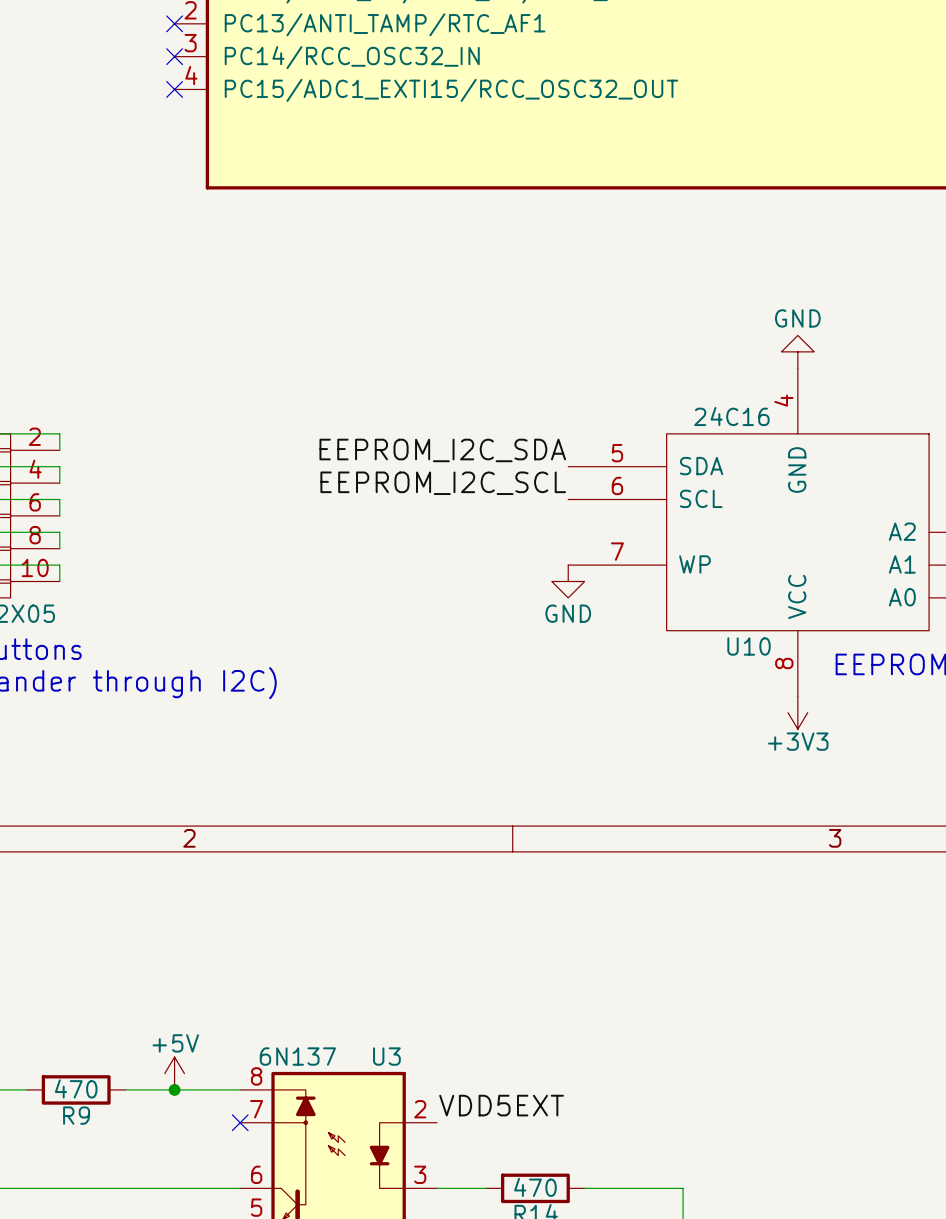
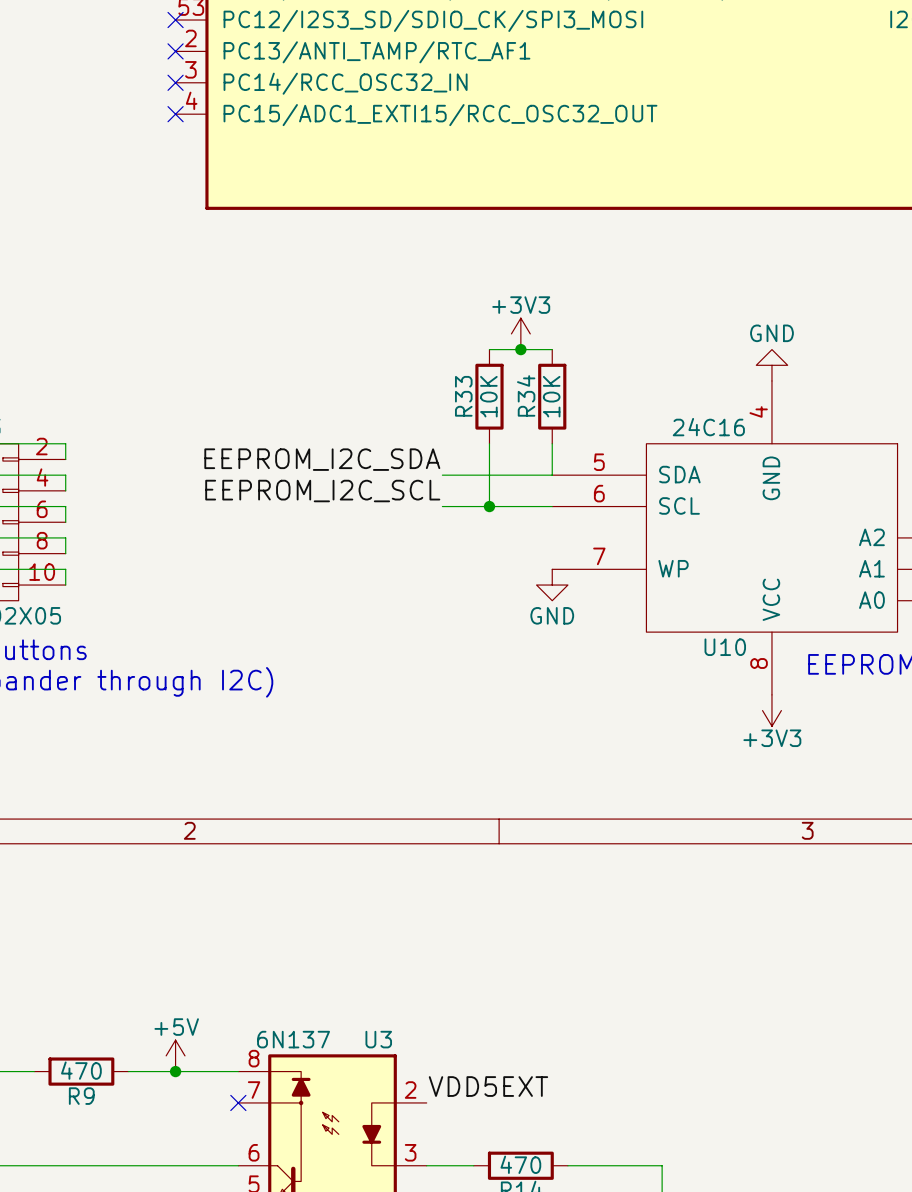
power symbol: none -> +3V3 (520, 333)
wire: none -> (489, 349) (552, 349)
junction: none -> (520, 349)
R33: none -> 10K (489, 396)
R34: none -> 10K (552, 396)
wire: none -> (489, 443) (489, 506)
wire: none -> (552, 443) (552, 475) (442, 475)
label position: EEPROM_I2C_SDA (442, 450) -> EEPROM_I2C_SDA (322, 459)
label position: EEPROM_I2C_SCL (443, 483) -> EEPROM_I2C_SCL (322, 491)
wire: none -> (442, 506) (552, 506)
junction: none -> (489, 506)

